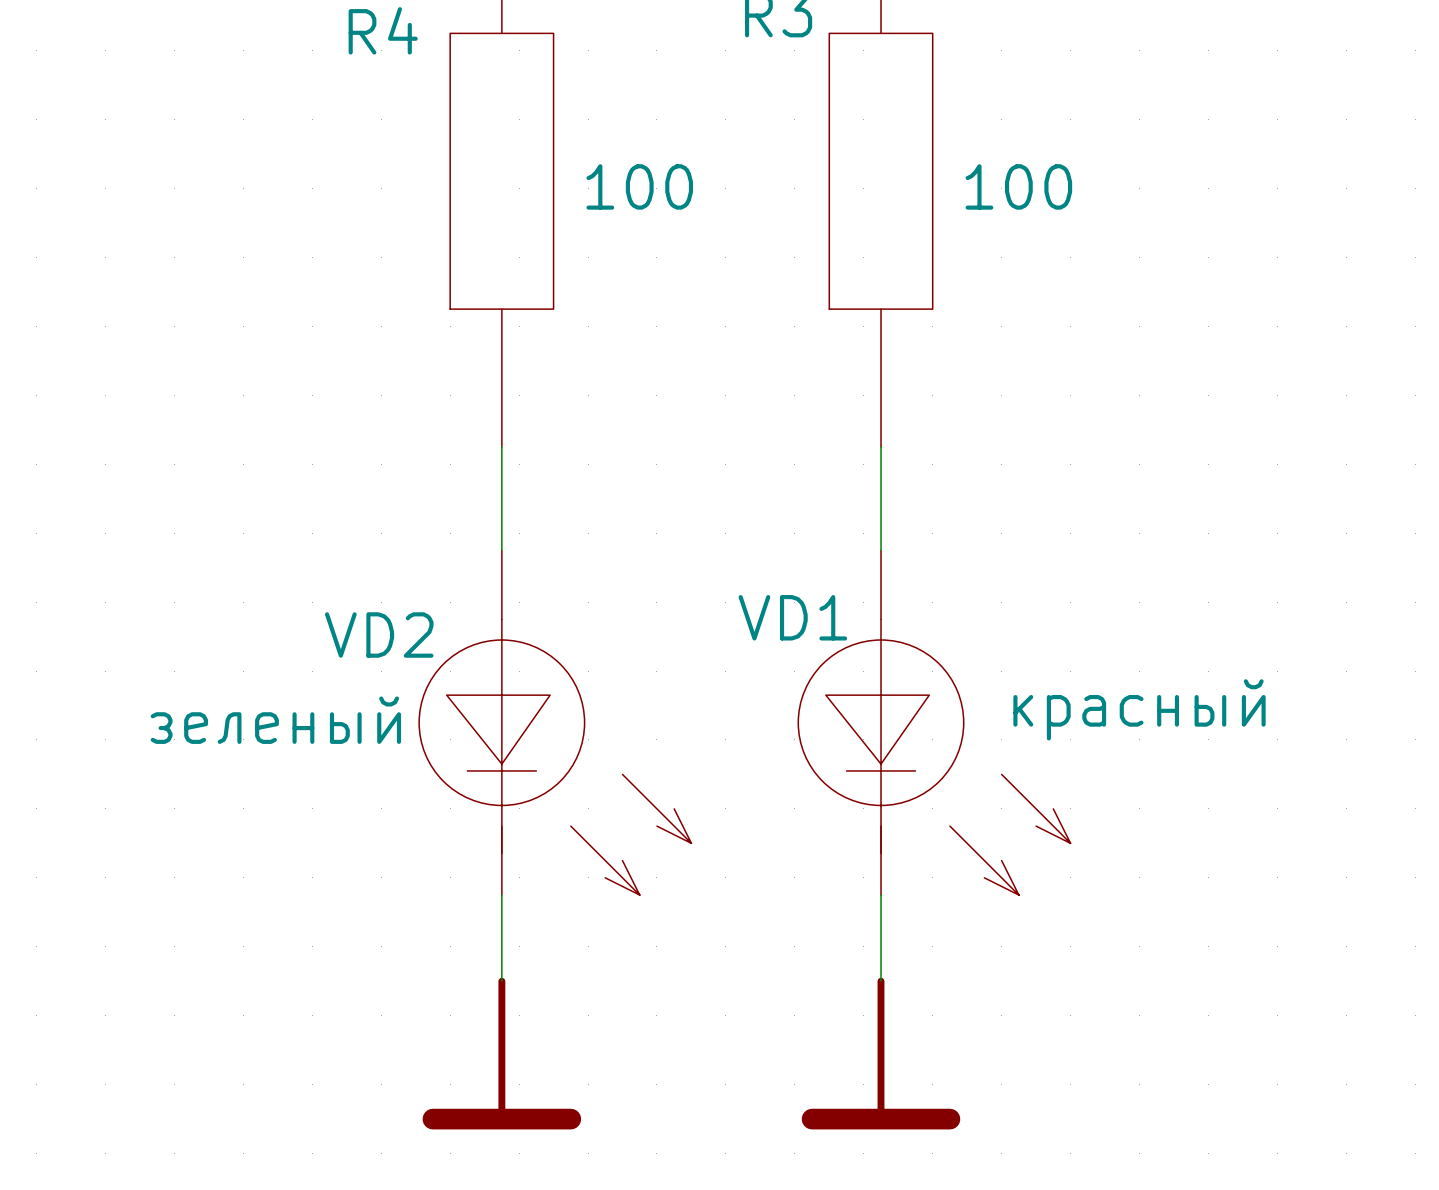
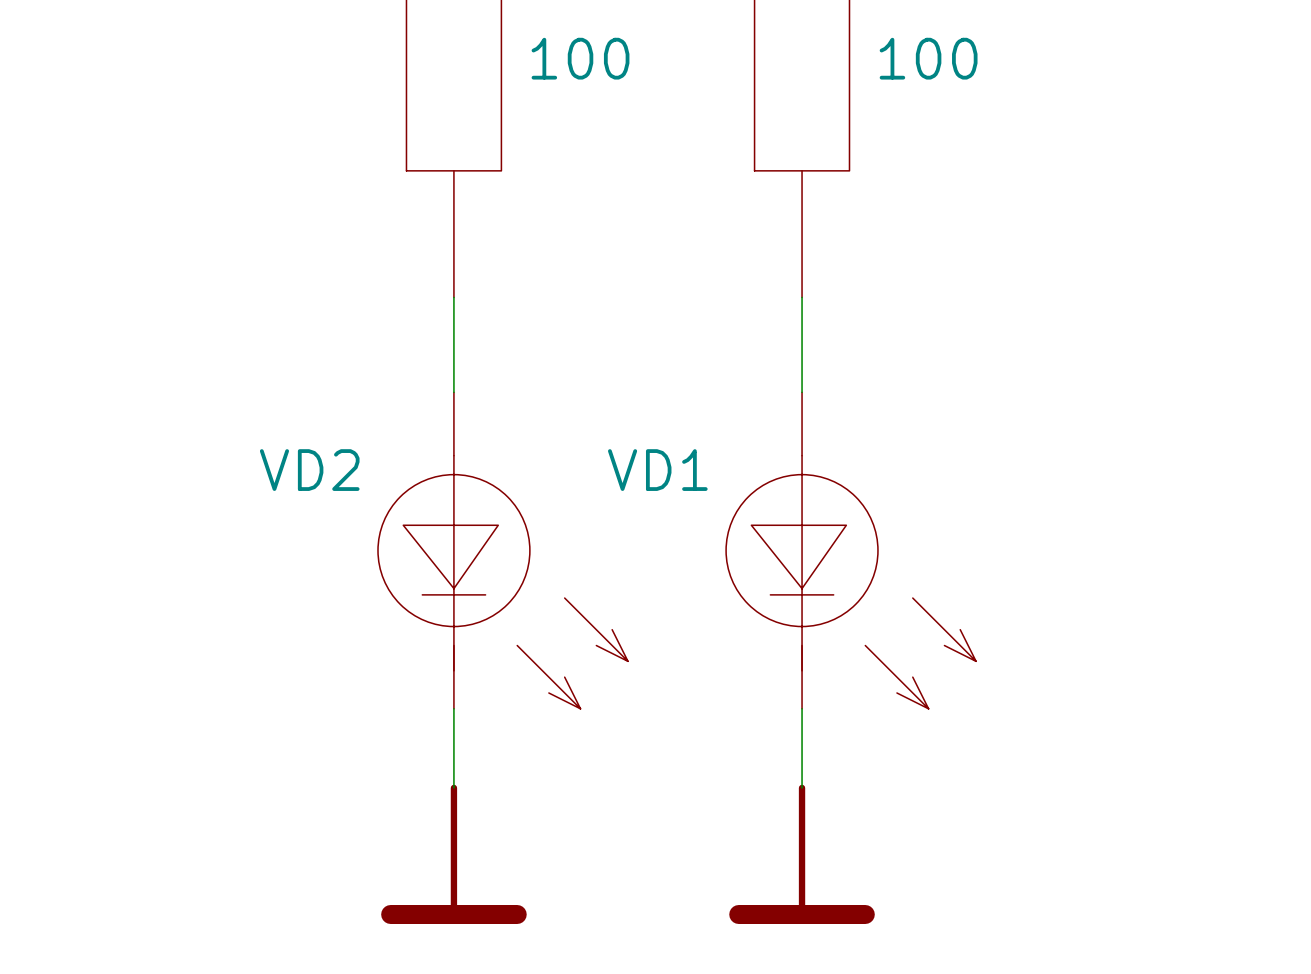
VD1 name position: VD1 (792, 617) -> VD1 (657, 470)
VD2 name position: VD2 (379, 635) -> VD2 (309, 470)
VD1 value: красный (1139, 709) -> none
VD2 value: зеленый (275, 720) -> none

